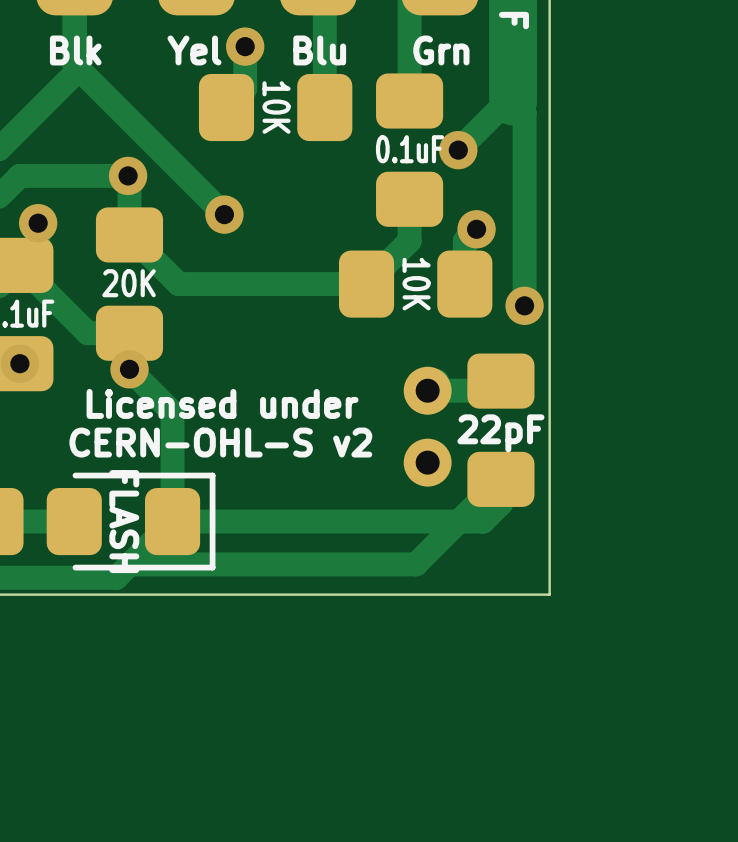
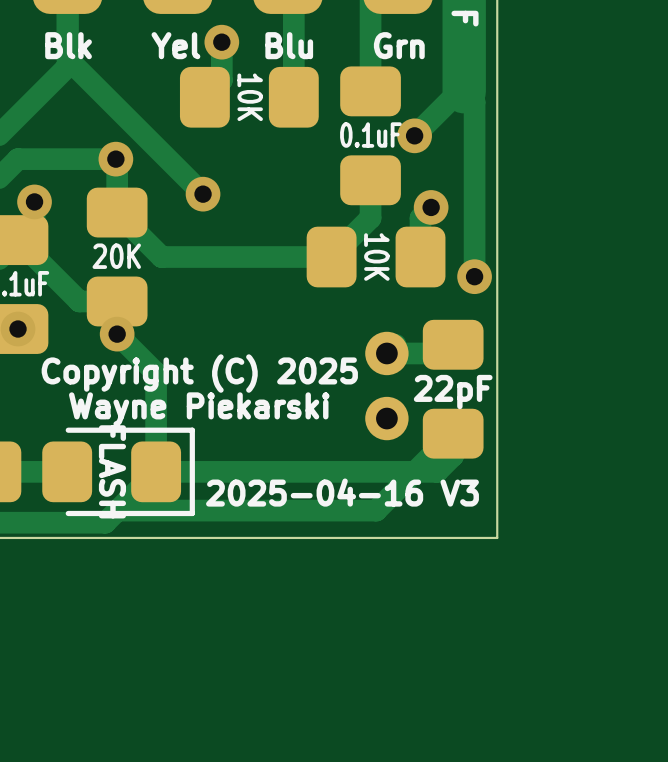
text: Licensed under (222, 403) -> Copyright (C) 2025 (199, 373)
text: CERN-OHL-S v2 (220, 442) -> Wayne Piekarski (199, 409)
text: none -> 2025-04-16 V3 (342, 492)

